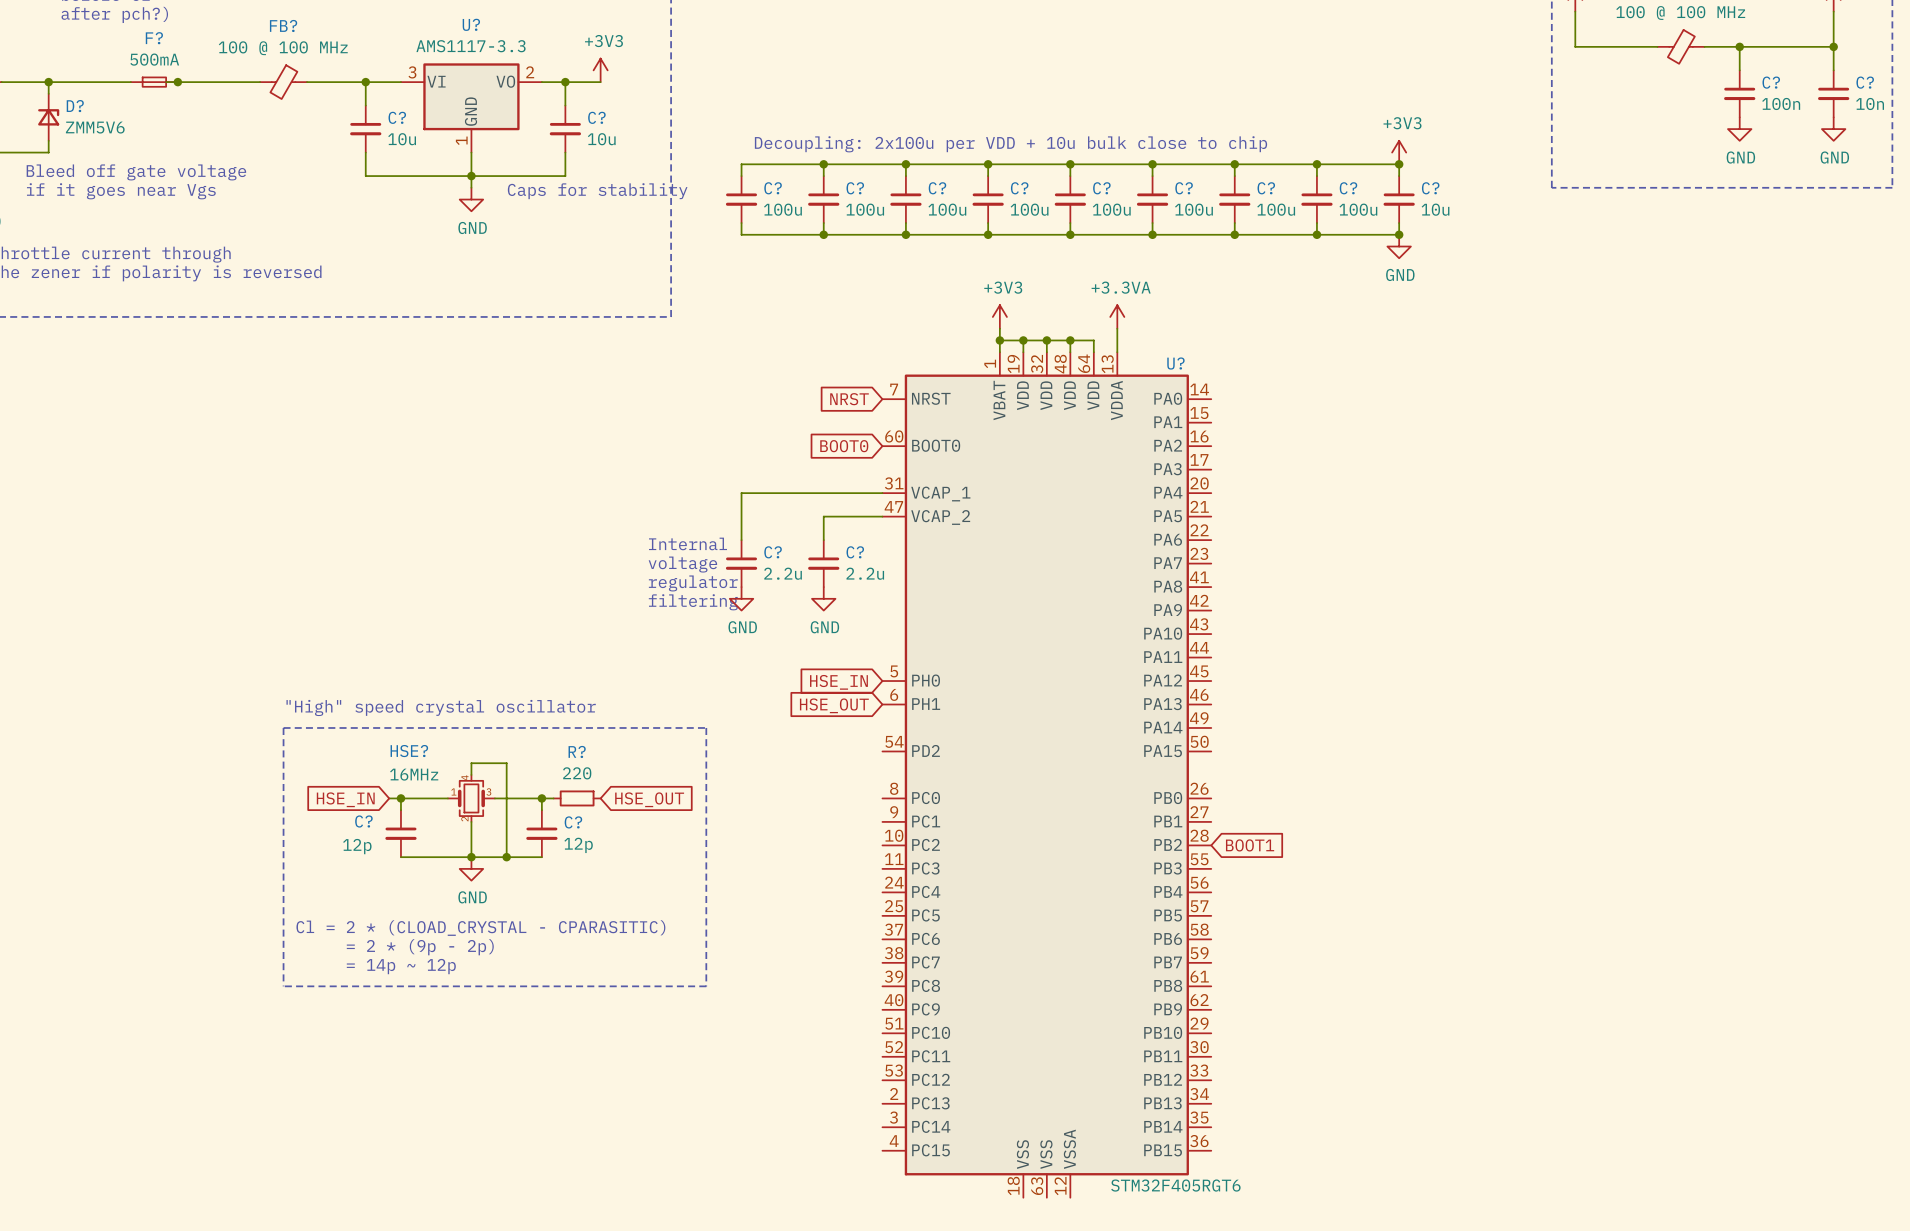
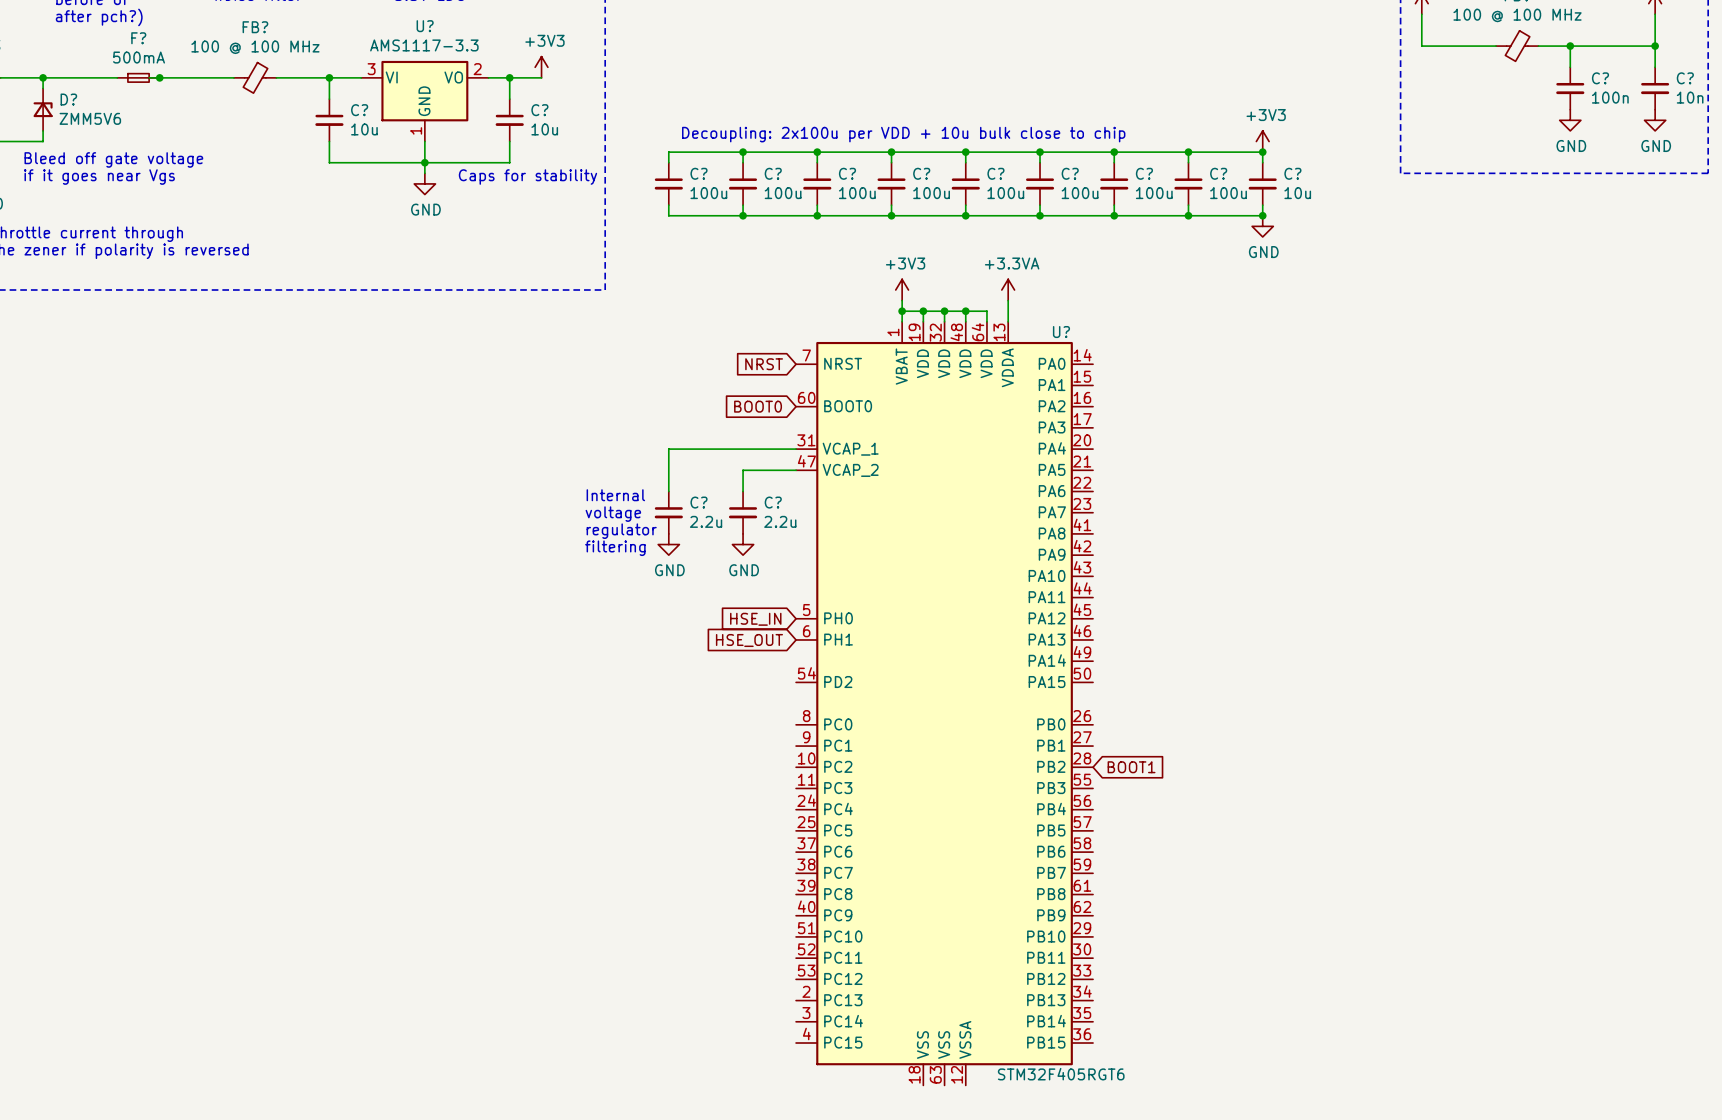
text: "High" speed crystal oscillator (441, 707) -> none
line: (283, 727) (706, 727) (706, 986) (283, 986) (283, 727) -> none
wire: (471, 774) (471, 763) (506, 763) (506, 857) -> none
wire: (389, 798) (447, 798) -> none
wire: (400, 798) (400, 810) -> none
junction: (400, 798) -> none
HSE?: 16MHz (471, 798) -> none
wire: (494, 798) (553, 798) -> none
wire: (541, 798) (541, 810) -> none
junction: (541, 798) -> none
R?: 220 (577, 798) -> none
global label: HSE_IN (345, 799) -> none
global label: HSE_OUT (649, 799) -> none
wire: (471, 821) (471, 857) -> none
C?: 12p (400, 833) -> none
C?: 12p (541, 833) -> none
wire: (400, 857) (541, 857) -> none
junction: (471, 857) -> none
junction: (506, 857) -> none
power symbol: GND (471, 868) -> none
text: Cl = 2 * (CLOAD_CRYSTAL - CPARASITIC) (480, 928) -> none
text: = 2 * (9p - 2p) (420, 947) -> none
text: = 14p ~ 12p (401, 966) -> none

